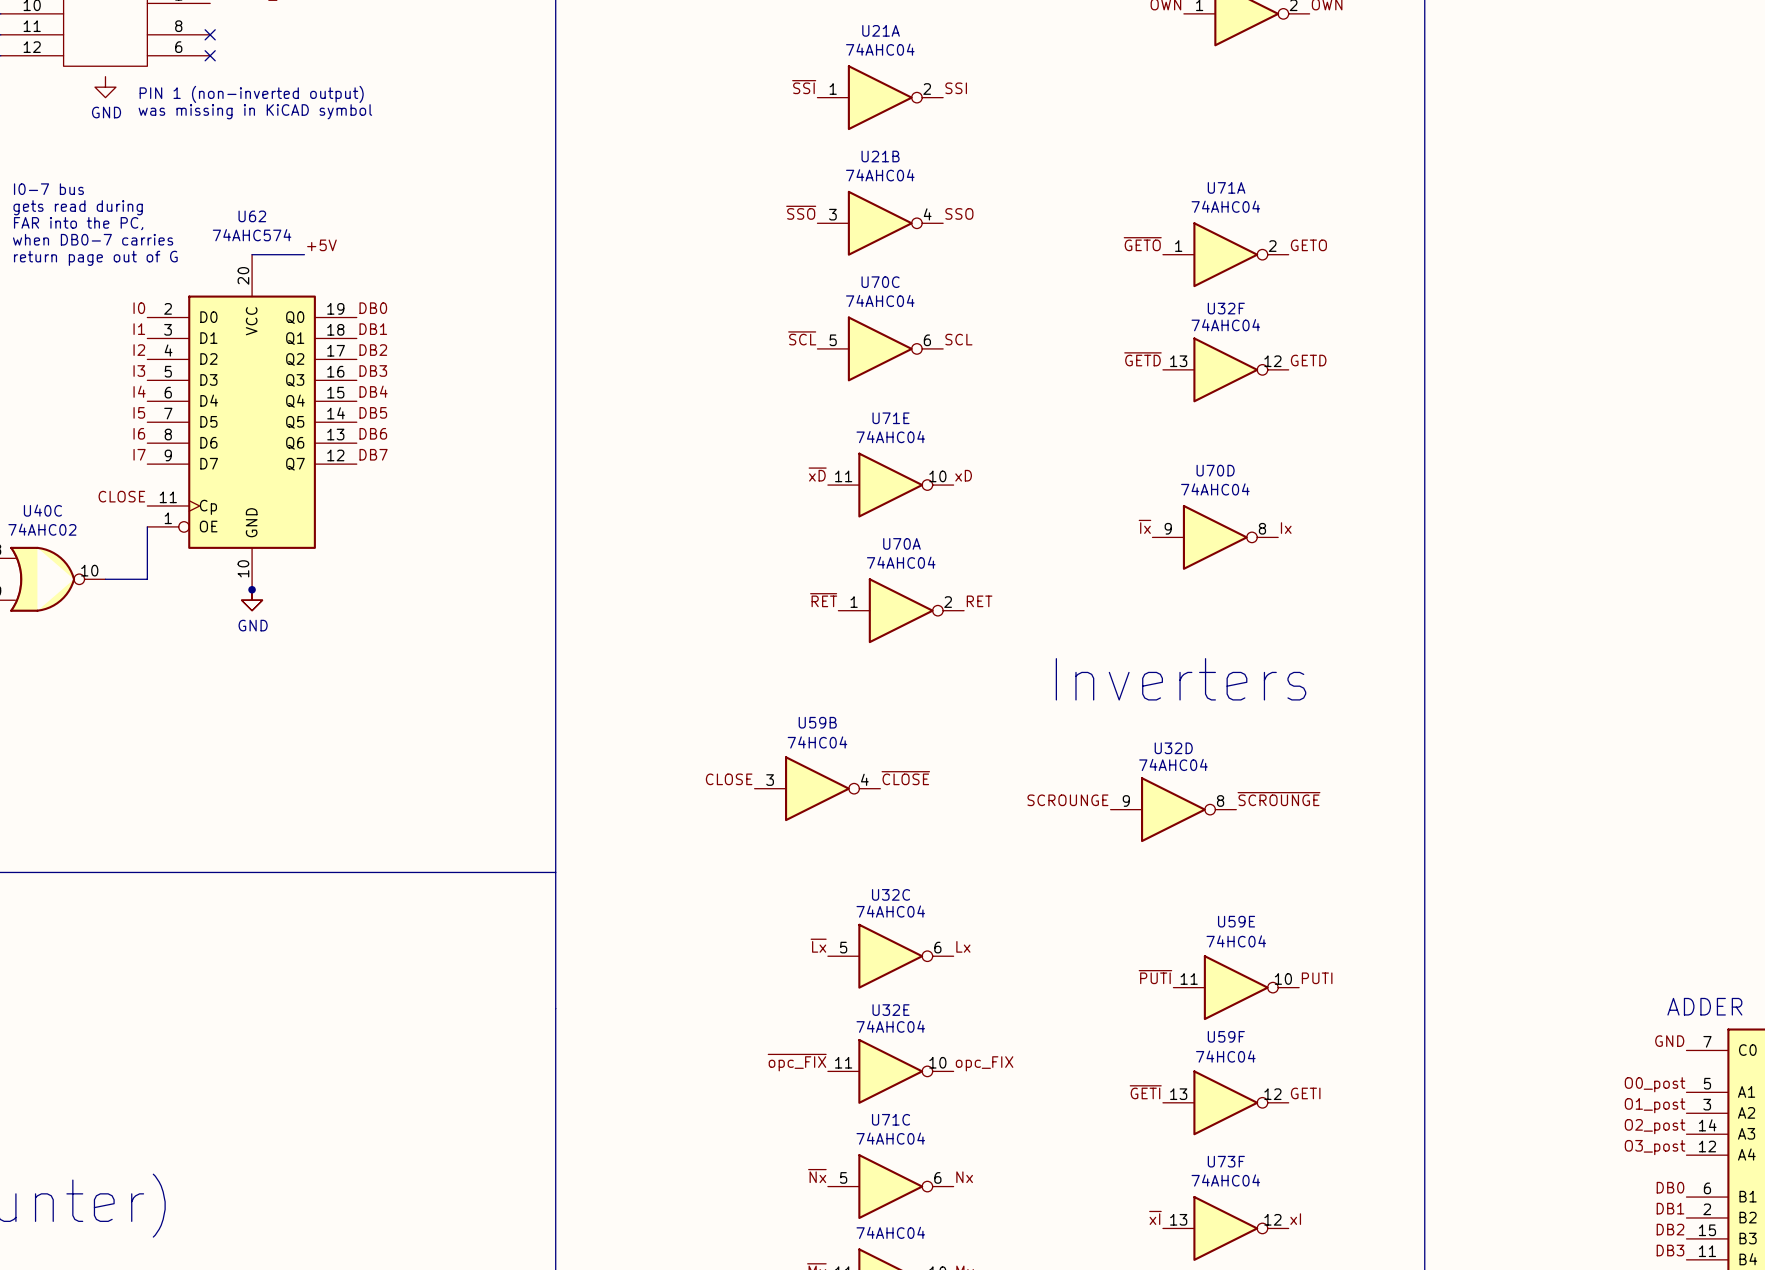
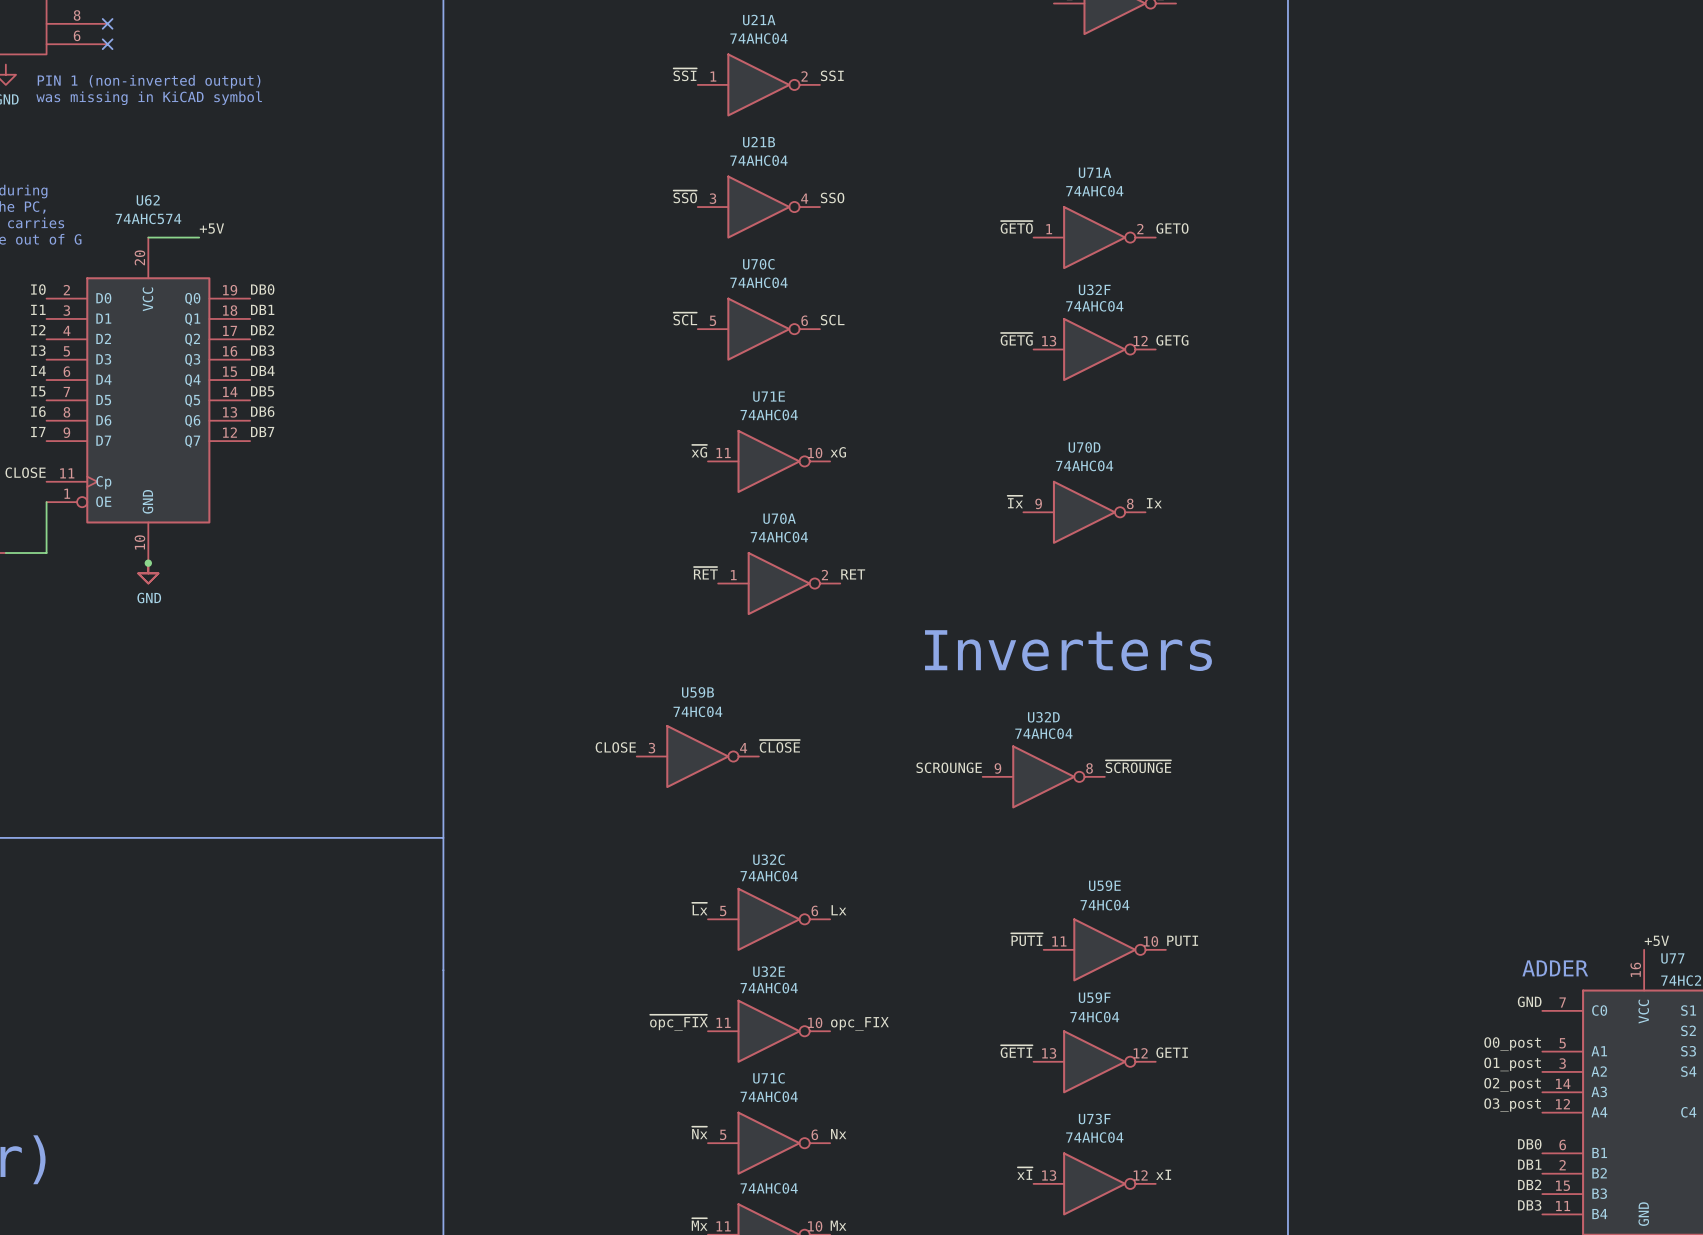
label: ~{GETD} (1142, 359) -> ~{GETG} (1016, 339)
label: GETD (1308, 360) -> GETG (1172, 340)
label: ~{xD} (817, 474) -> ~{xG} (699, 451)
label: xD (963, 475) -> xG (838, 452)

